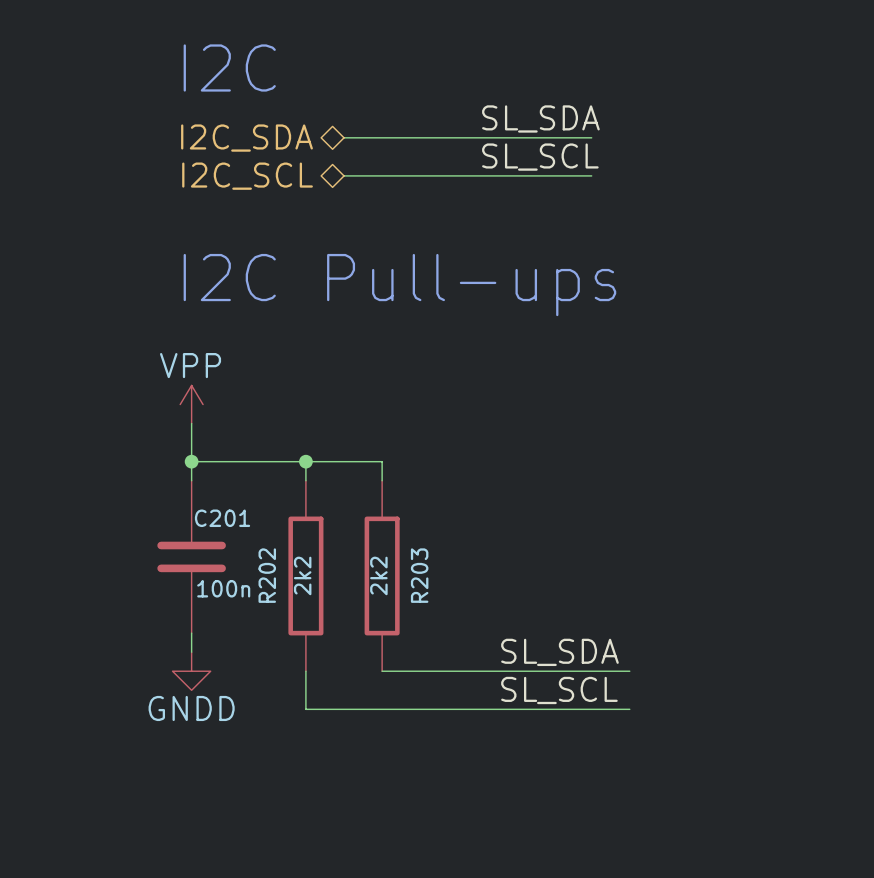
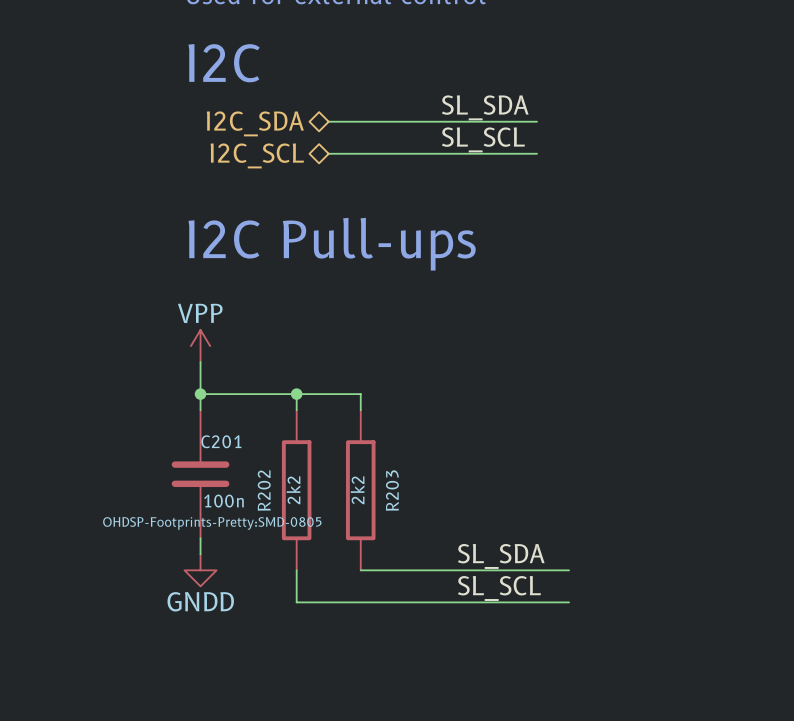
C201 text: none -> OHDSP-Footprints-Pretty:SMD-0805 (212, 523)

